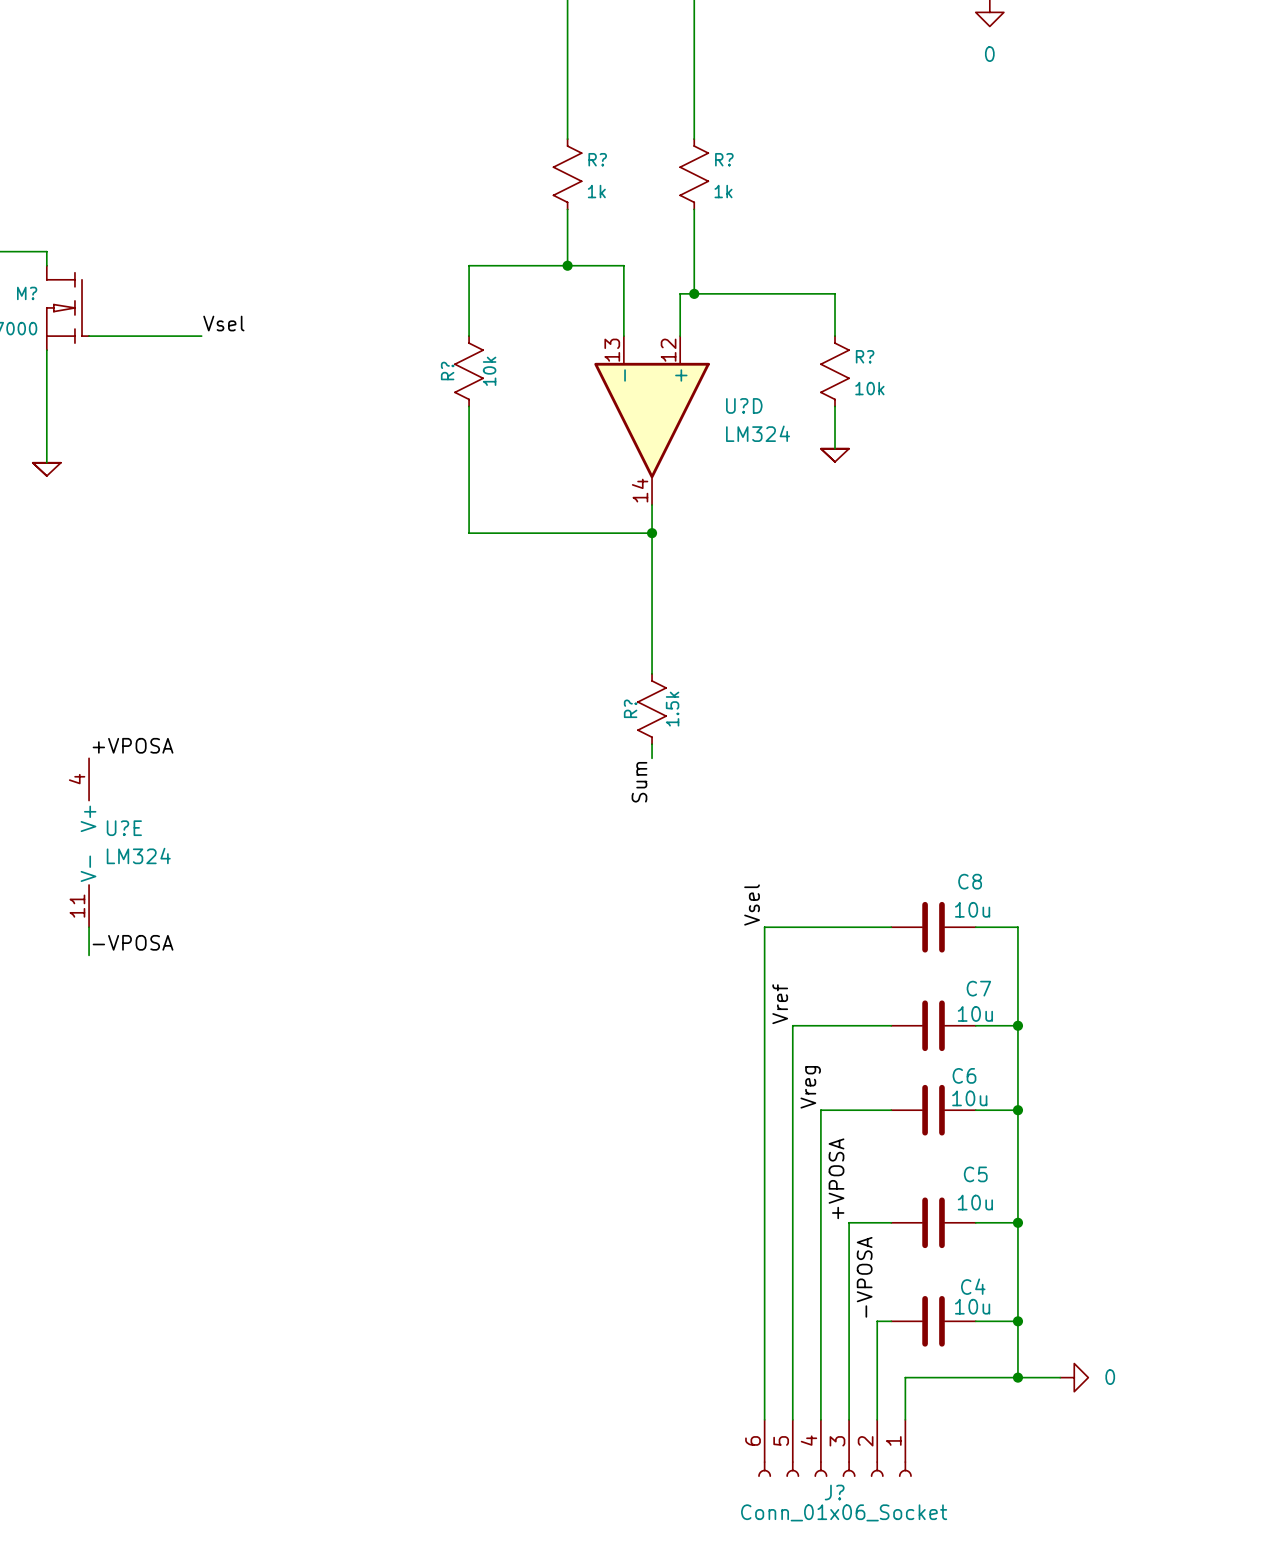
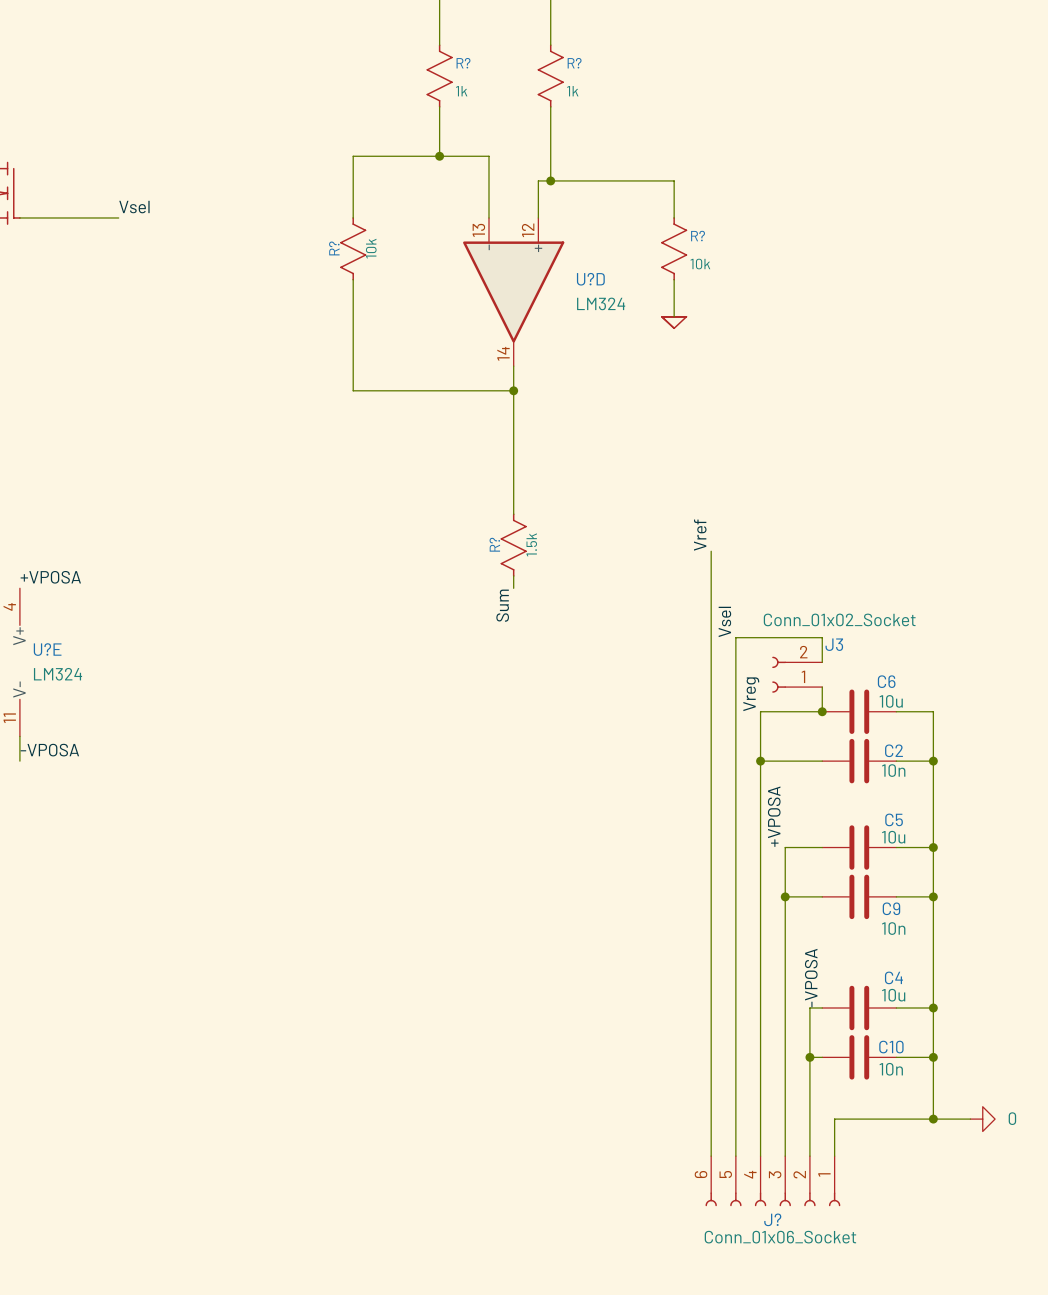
label: none -> Vref (700, 535)
J3: none -> Conn_01x02_Socket (797, 674)
wire: none -> (822, 687) (822, 711) (760, 711) (760, 1156)
junction: none -> (822, 711)
wire: none -> (896, 711) (933, 711) (933, 1119)
label position: Vsel (752, 905) -> Vsel (724, 621)
wire: (891, 927) (764, 927) (764, 1419) -> none
C8: 10u (933, 927) -> none
wire: (975, 927) (1017, 927) (1017, 1363) -> (970, 1119) (834, 1119)
wire: none -> (760, 761) (822, 761)
junction: none -> (760, 761)
C2: none -> 10n (859, 761)
wire: none -> (896, 761) (933, 761)
junction: none -> (933, 761)
label: Vref (780, 1004) -> none
wire: (891, 1025) (792, 1025) (792, 1419) -> none
C7: 10u (933, 1025) -> none
wire: (975, 1025) (1017, 1025) -> (896, 847) (933, 847)
junction: (1017, 1025) -> none
wire: none -> (822, 847) (785, 847) (785, 1156)
junction: none -> (933, 847)
label position: Vreg (810, 1087) -> Vreg (751, 694)
wire: (891, 1110) (820, 1110) (820, 1419) -> none
C6 position: (933, 1110) -> (859, 711)
junction: none -> (785, 896)
junction: (1017, 1110) -> none
C9: none -> 10n (859, 896)
wire: none -> (896, 896) (933, 896)
junction: none -> (933, 896)
C5 name position: C5 (975, 1174) -> C5 (894, 819)
label position: +VPOSA (836, 1178) -> +VPOSA (774, 816)
C5 value position: 10u (975, 1202) -> 10u (893, 837)
wire: (891, 1222) (849, 1222) (849, 1419) -> none
C5 position: (933, 1222) -> (859, 847)
wire: (975, 1222) (1017, 1222) -> (896, 1007) (933, 1007)
junction: (1017, 1222) -> none
wire: none -> (822, 1007) (809, 1007) (809, 1156)
junction: none -> (933, 1007)
label position: -VPOSA (864, 1277) -> -VPOSA (811, 978)
wire: none -> (809, 1057) (822, 1057)
junction: none -> (809, 1057)
C10: none -> 10n (859, 1057)
junction: none -> (933, 1057)
wire: (877, 1321) (891, 1321) -> (711, 1082) (711, 551)
C4 position: (933, 1321) -> (859, 1007)
wire: (975, 1321) (1017, 1321) -> (896, 1057) (933, 1057)
junction: (1017, 1321) -> none
junction: none -> (933, 1119)
wire: (905, 1377) (1060, 1377) -> (735, 1131) (735, 637) (822, 637) (822, 662)
wire: none -> (834, 1131) (834, 1156)
junction: (1017, 1377) -> none
power symbol position: 0 (1074, 1377) -> 0 (982, 1119)
J? position: (835, 1448) -> (772, 1181)

